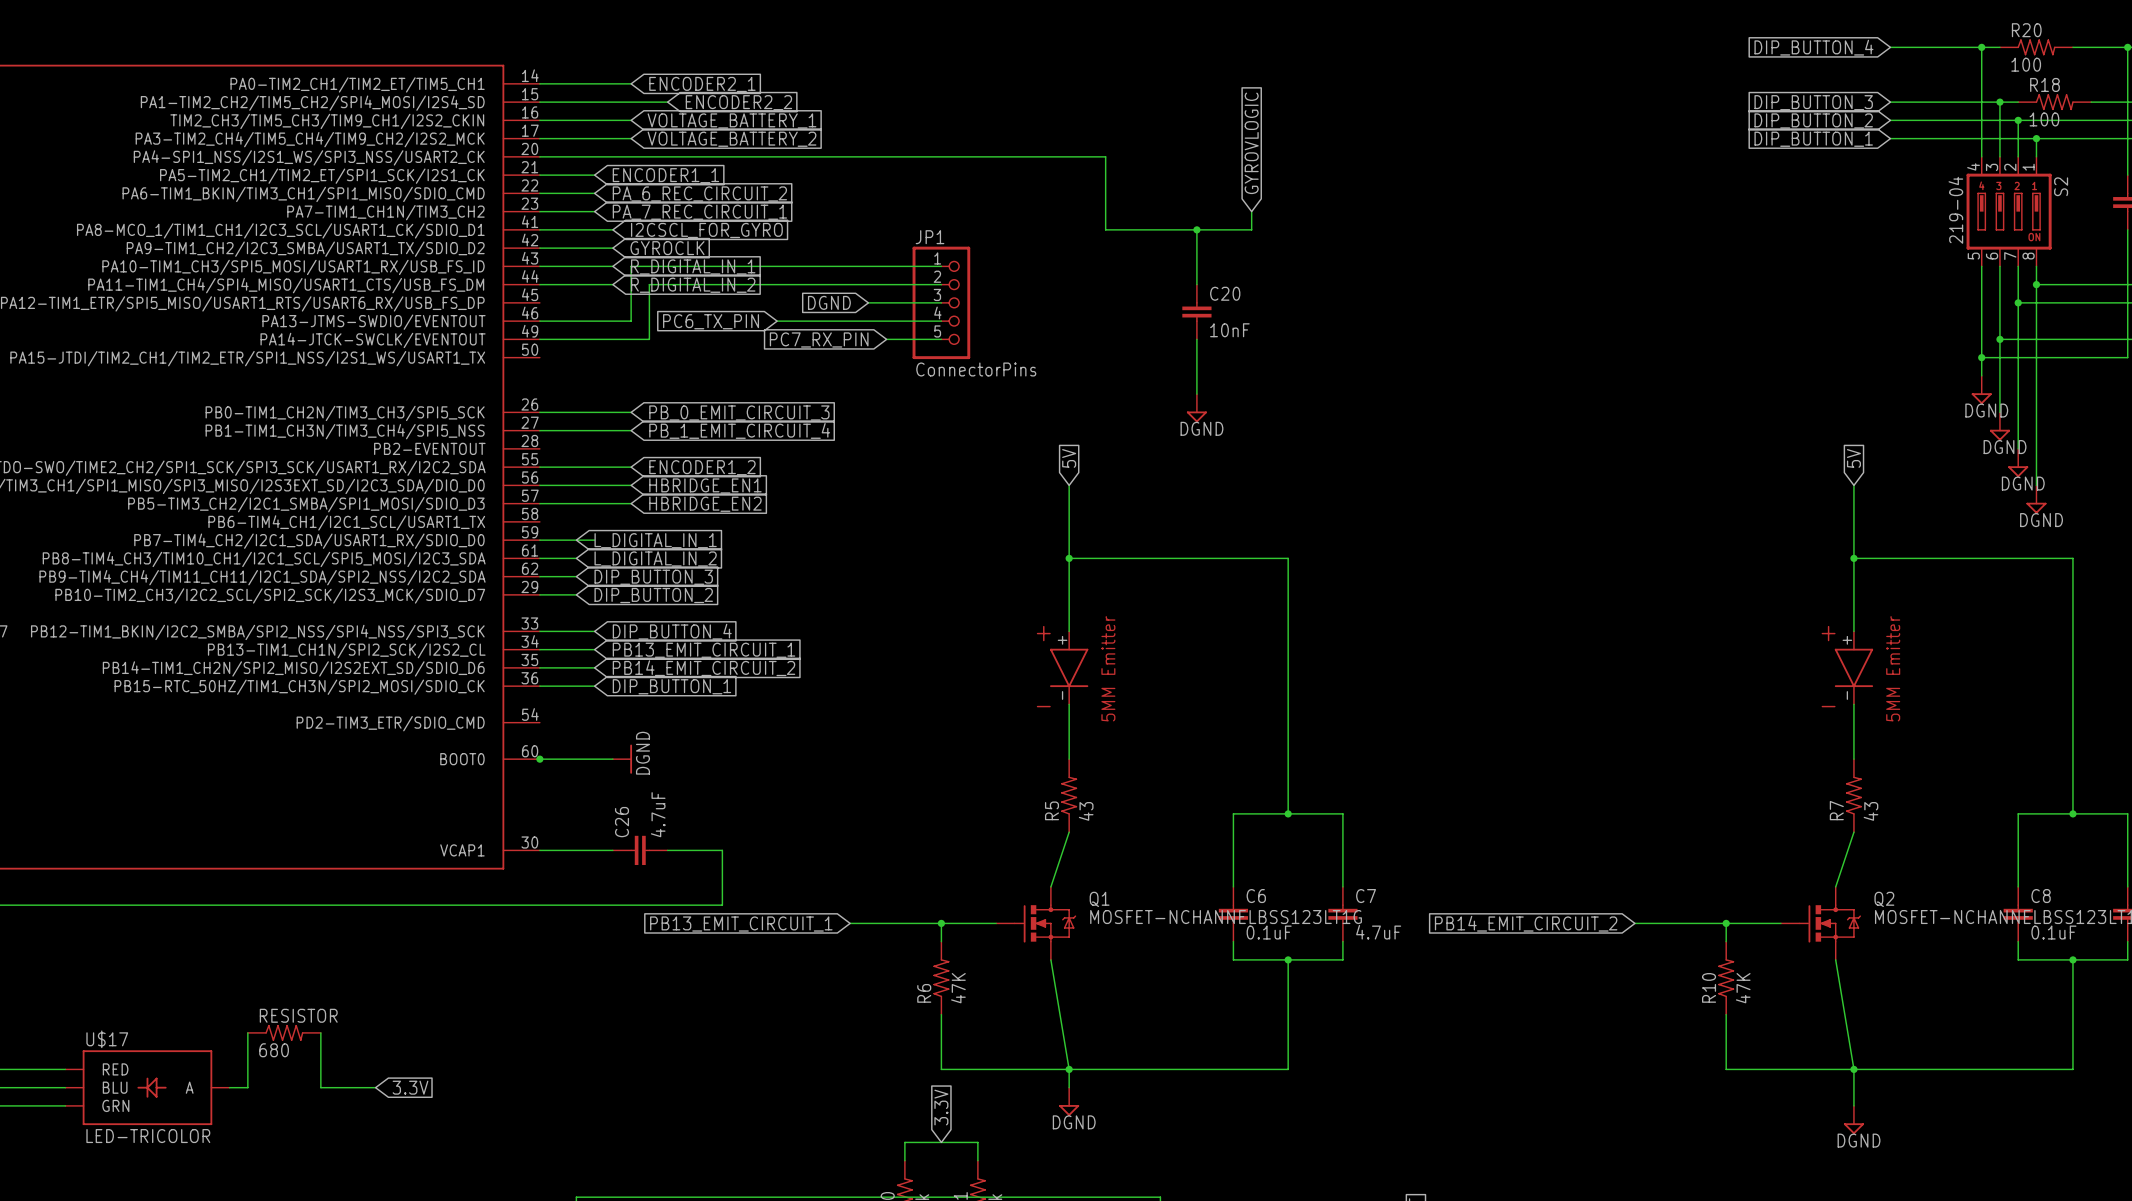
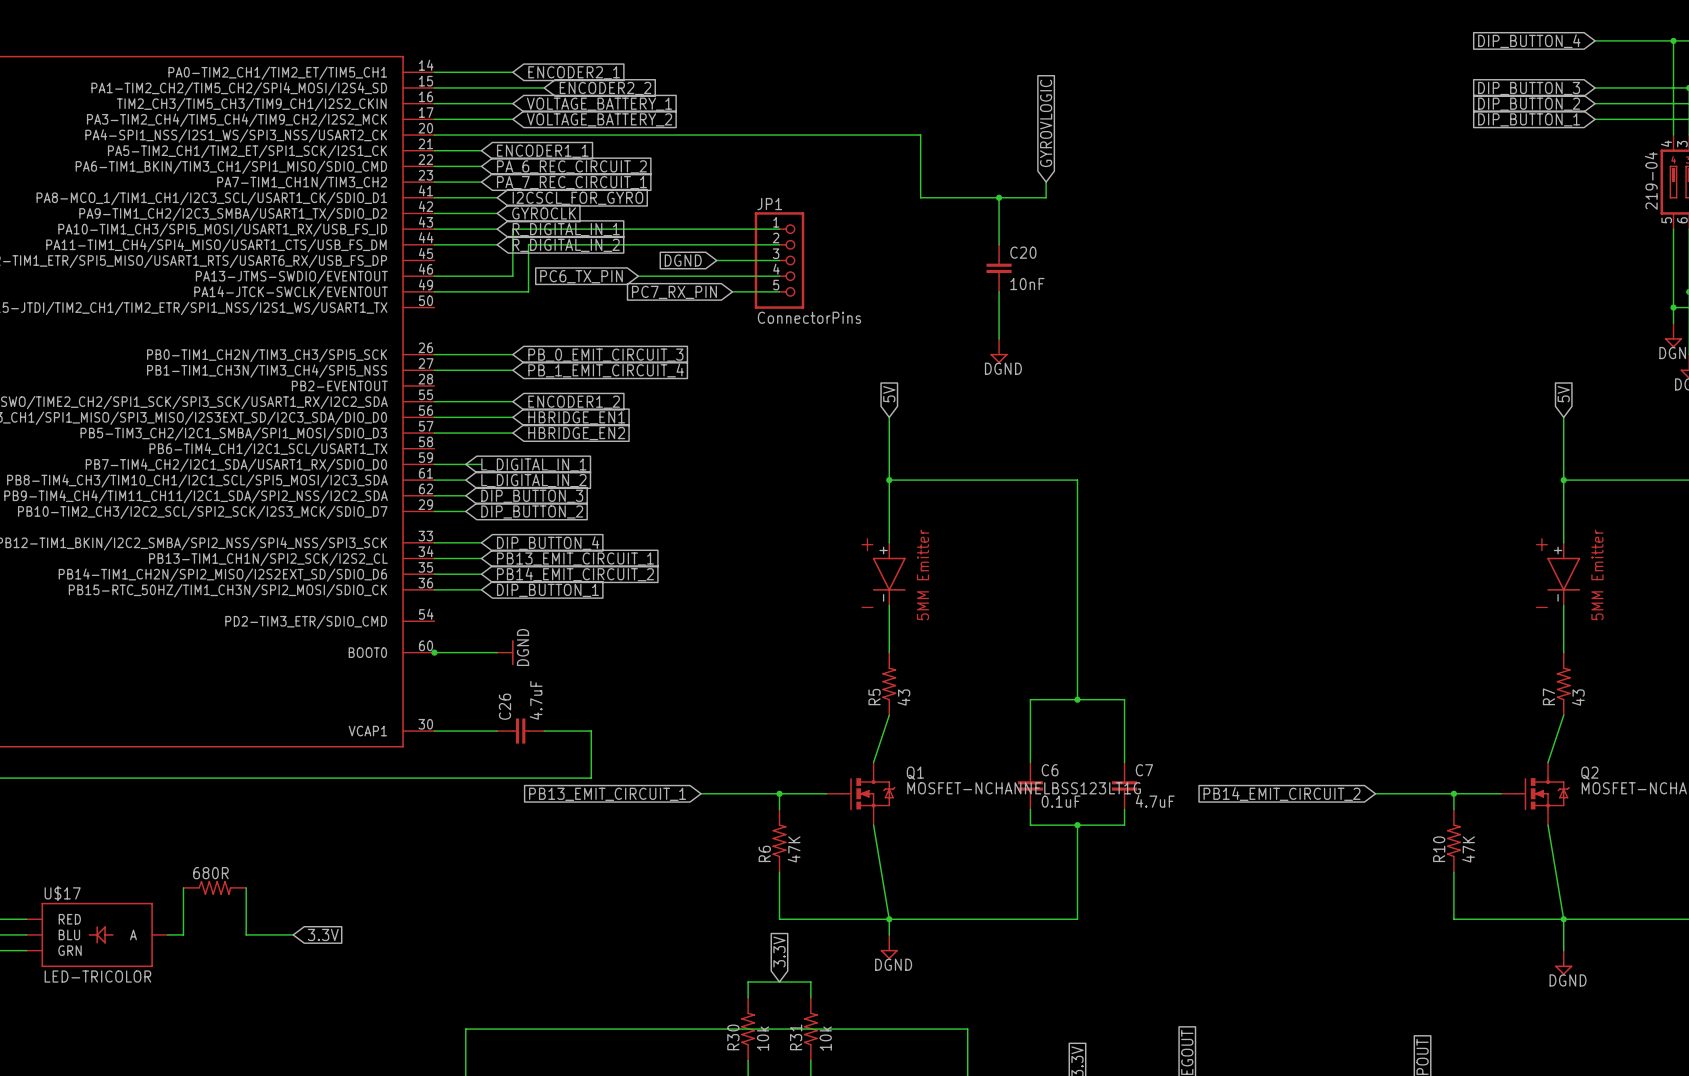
RESISTOR name: RESISTOR (298, 1015) -> 680R (210, 873)
RESISTOR value: 680 (274, 1050) -> none

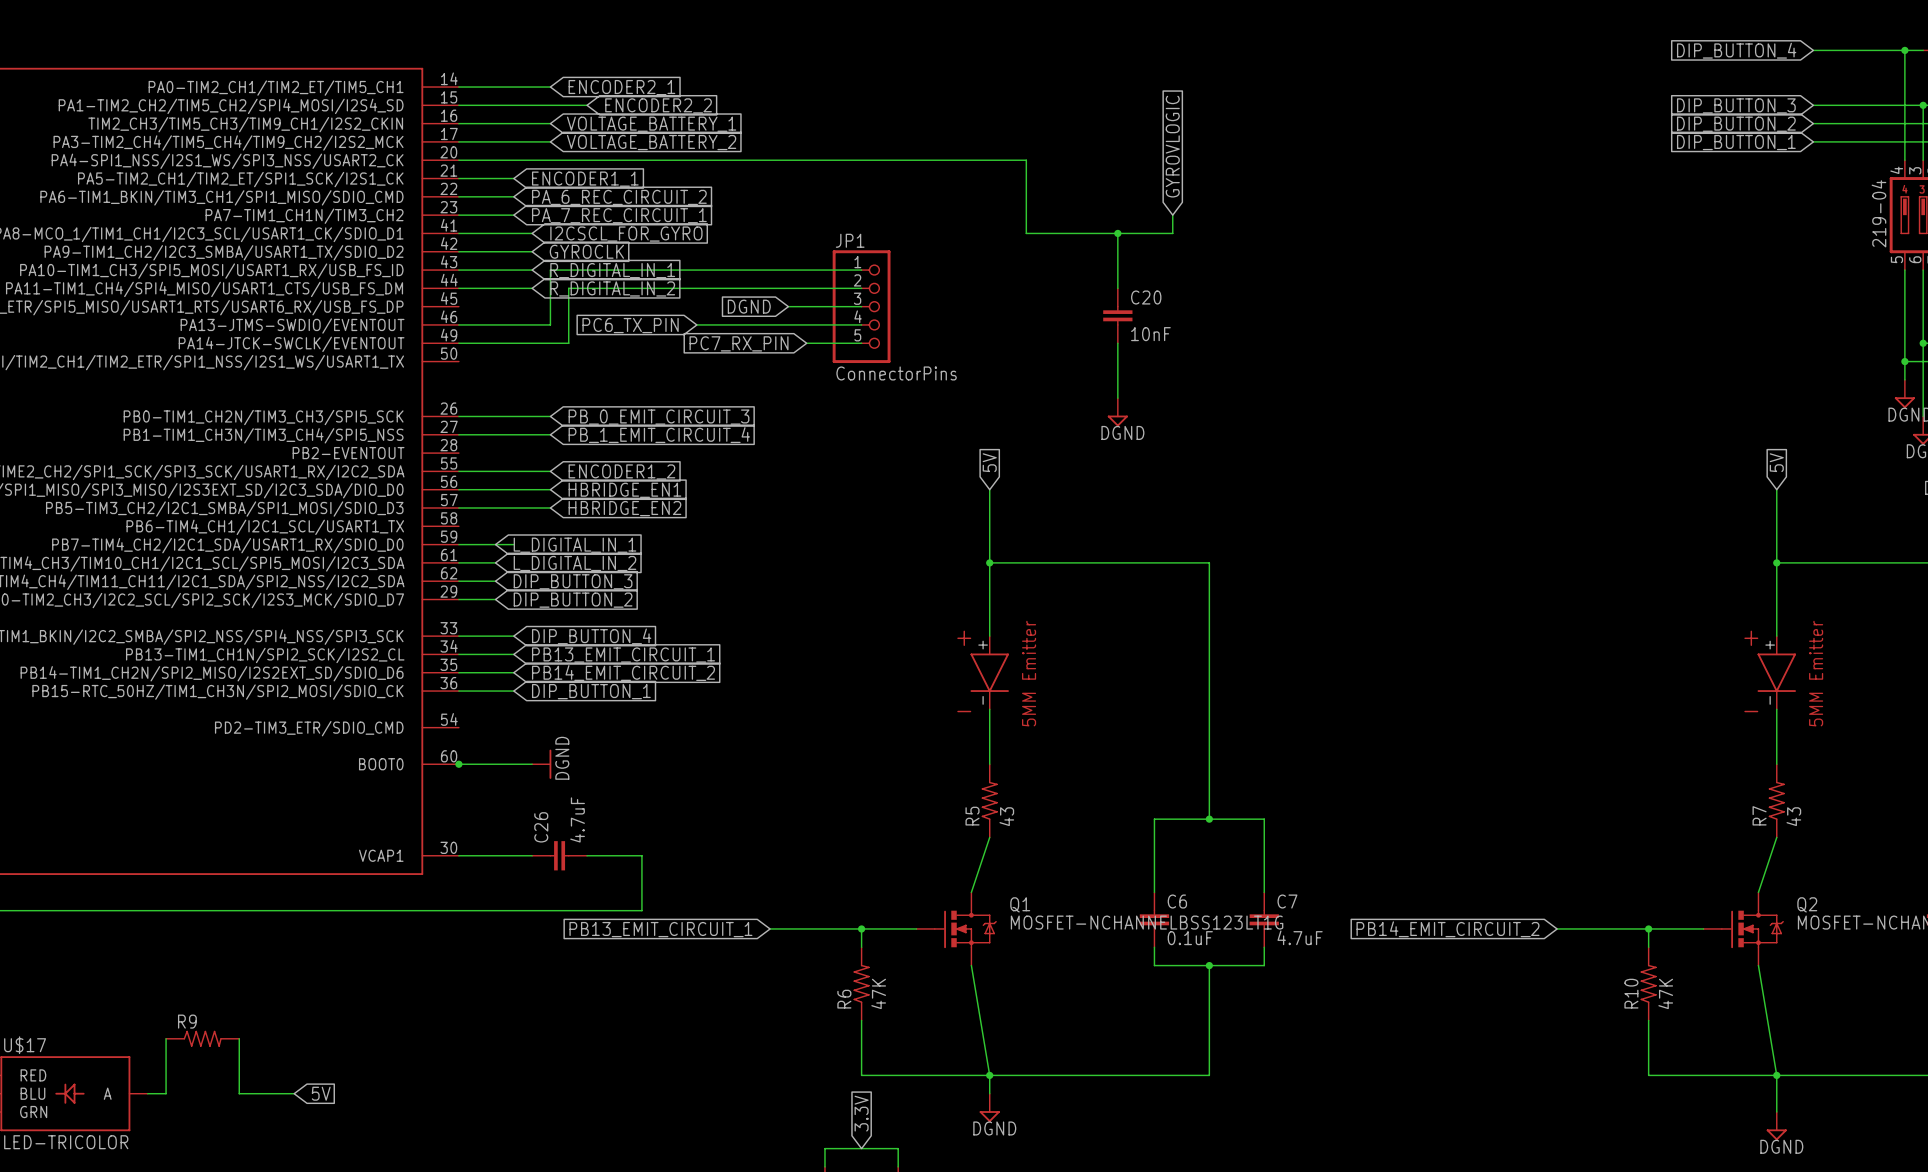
680R name: 680R (210, 873) -> R9 (187, 1021)
global label: 3.3V (323, 934) -> 5V (321, 1093)

